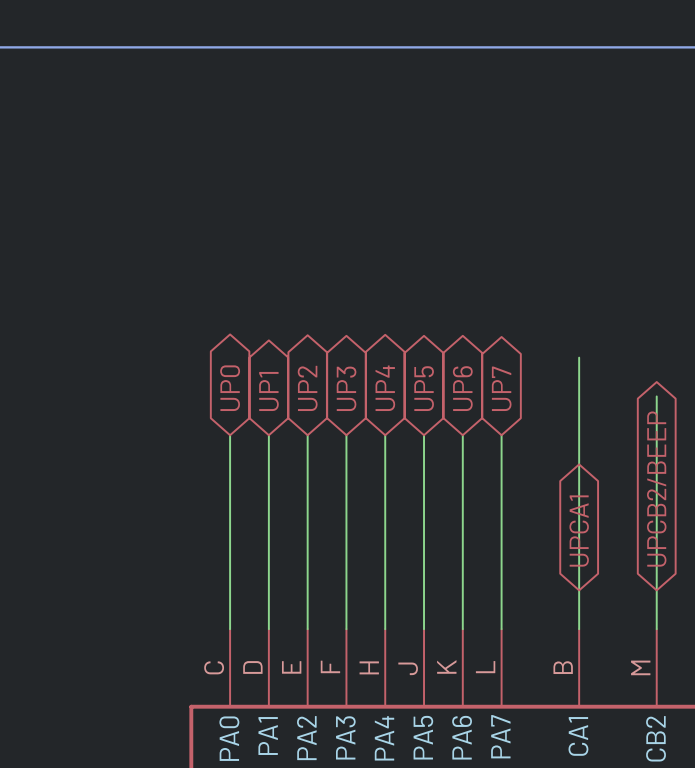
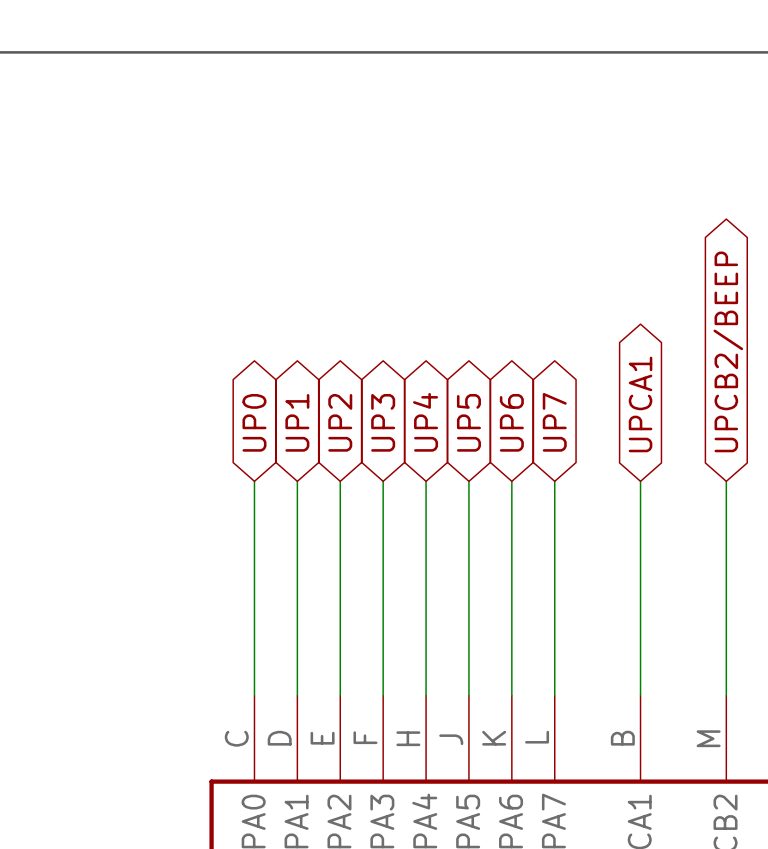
wire: (579, 357) (579, 435) -> none
wire: (656, 396) (656, 435) -> none
global label position: UPCB2/BEEP (656, 489) -> UPCB2/BEEP (728, 351)
global label position: UPCA1 (579, 531) -> UPCA1 (640, 404)

